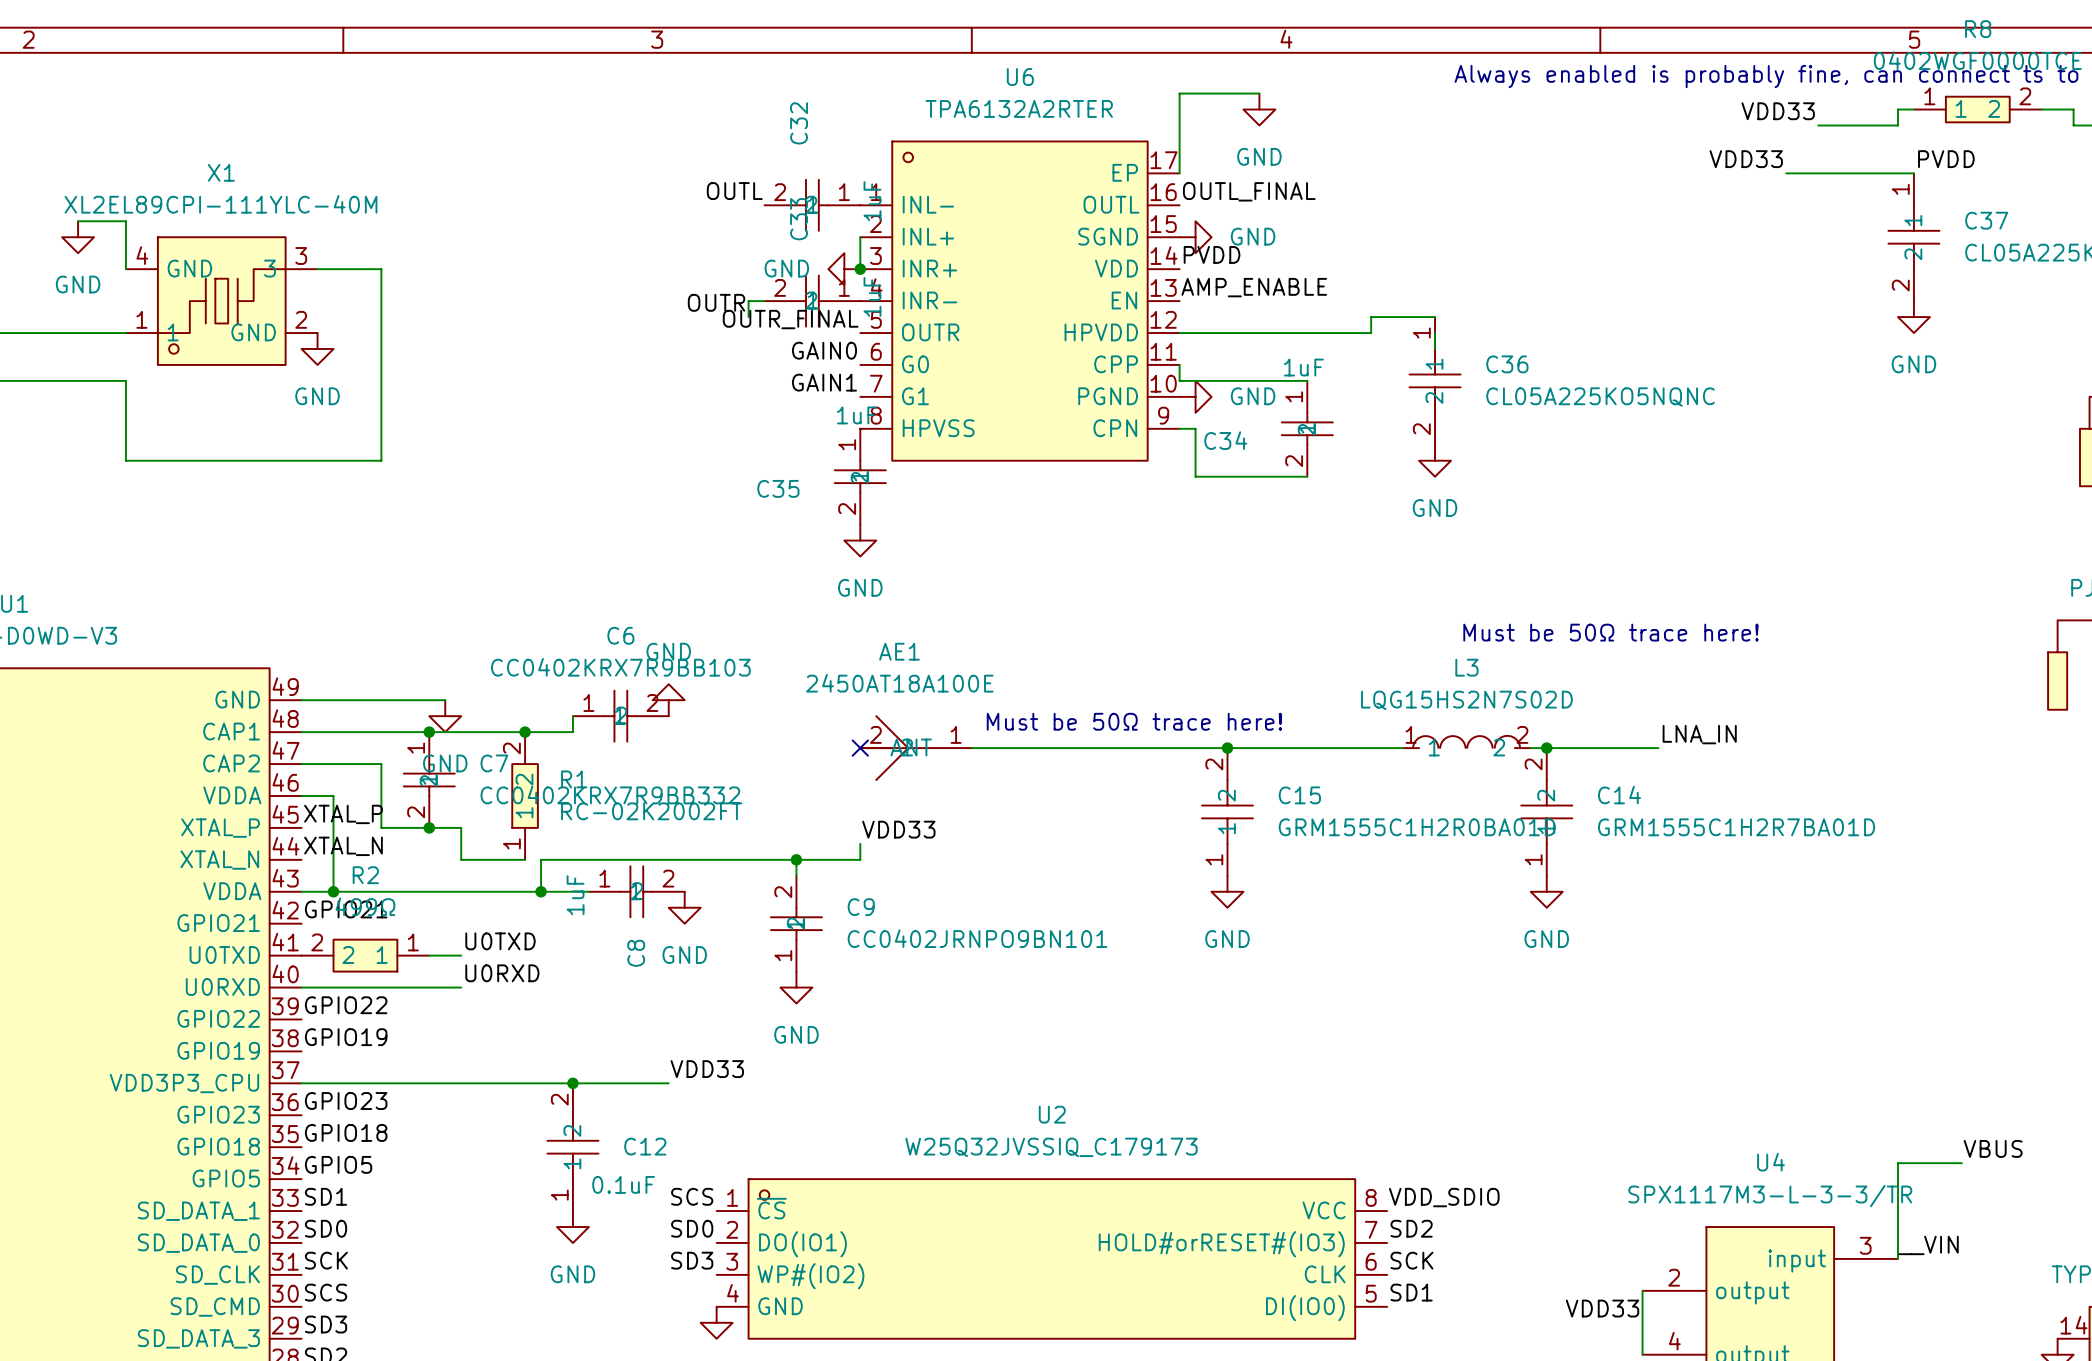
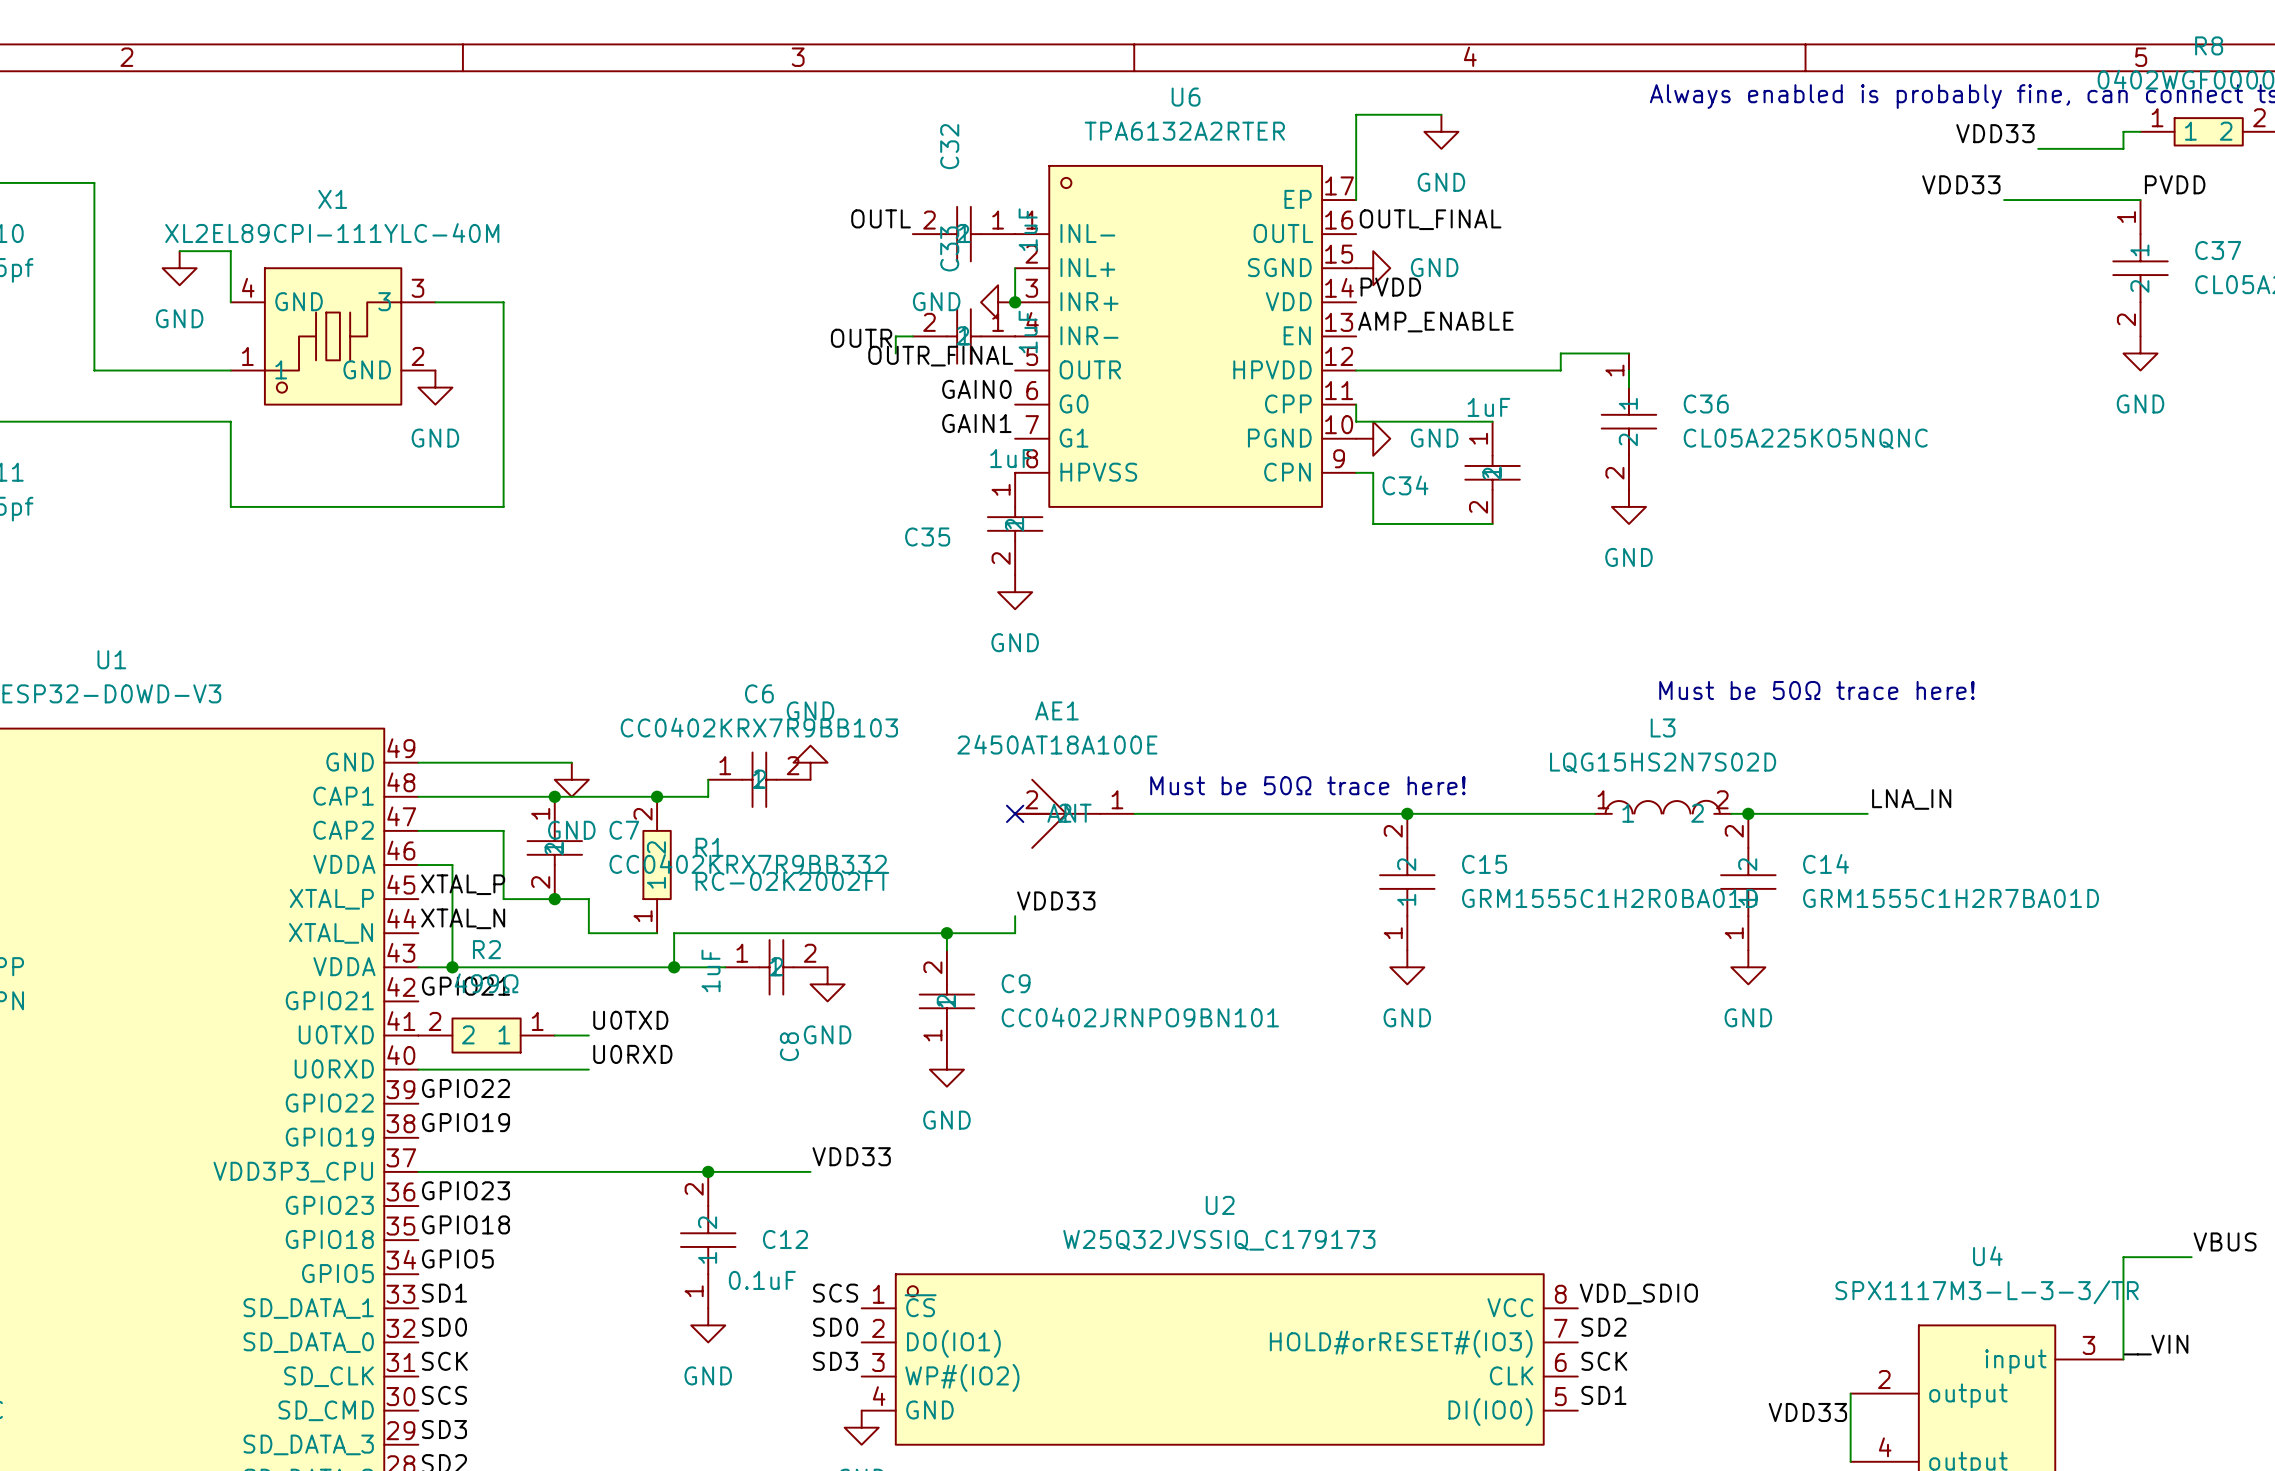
C8 name position: C8 (636, 953) -> C8 (789, 1046)

